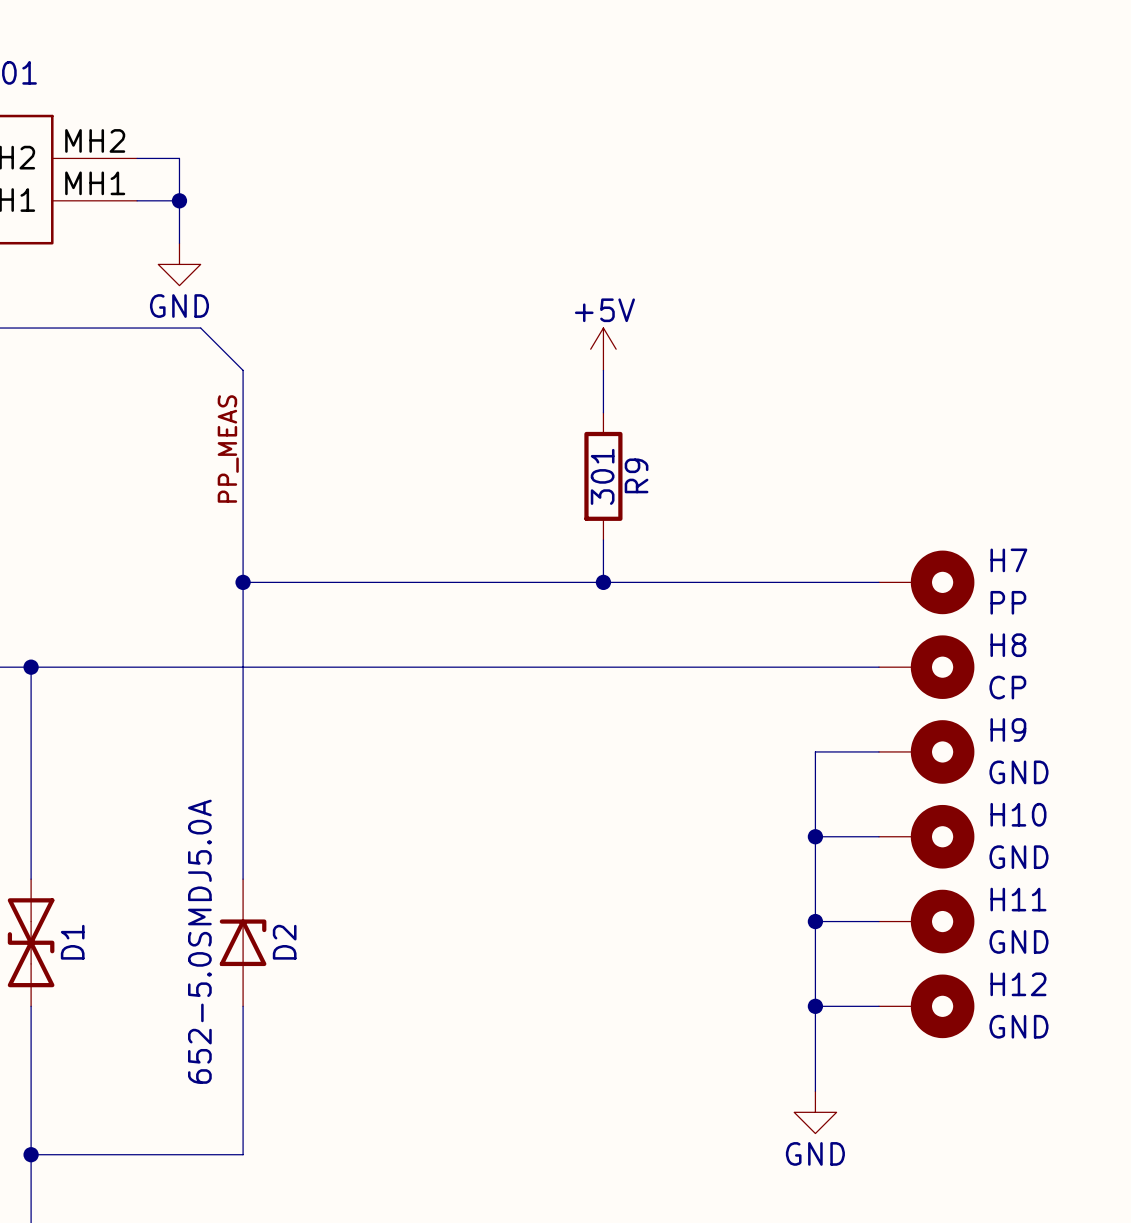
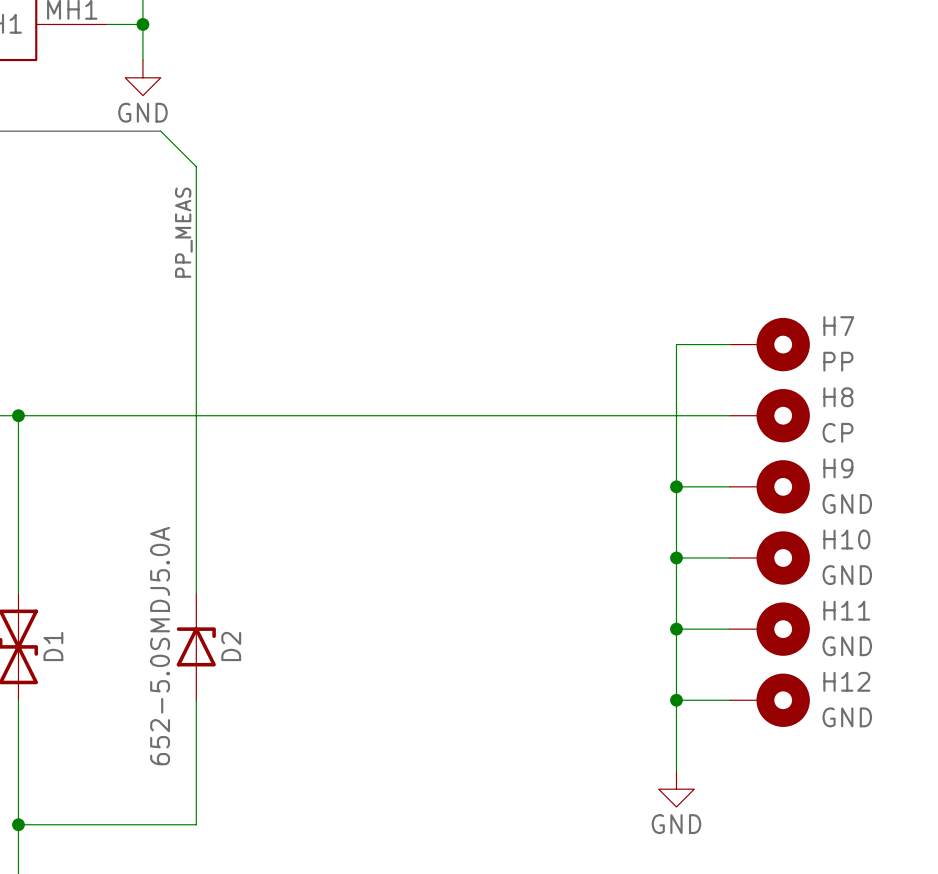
power symbol: +5V (603, 349) -> none
wire: (603, 370) (603, 412) -> none
R9: 301 (603, 476) -> none
wire: (603, 539) (603, 582) -> none
wire: (243, 582) (815, 582) -> (676, 486) (676, 344)
junction: (243, 582) -> none
junction: (603, 582) -> none
junction: none -> (676, 486)

